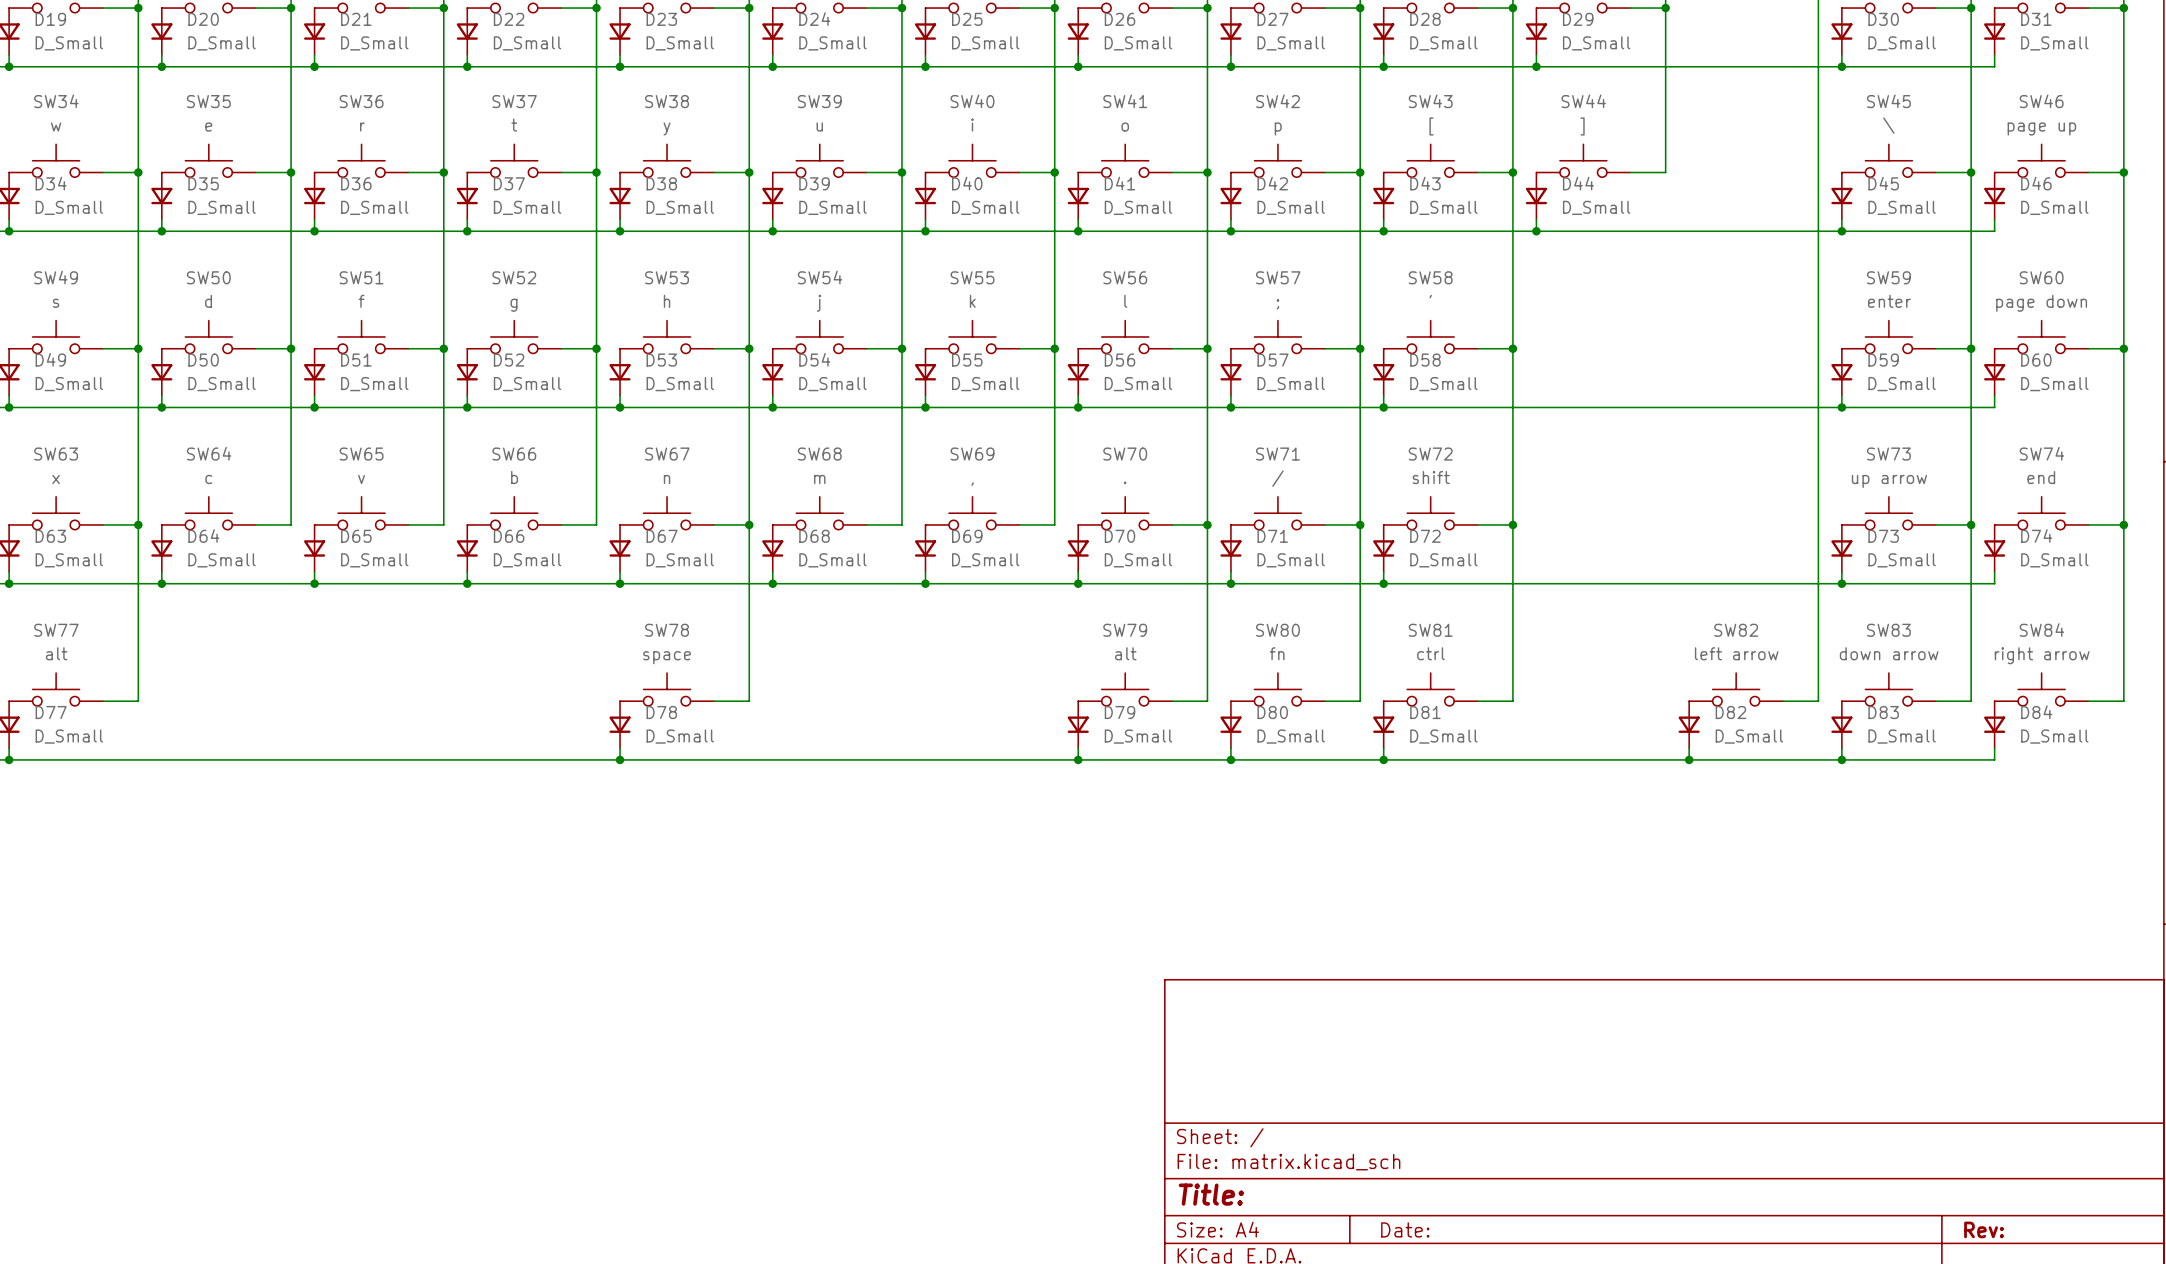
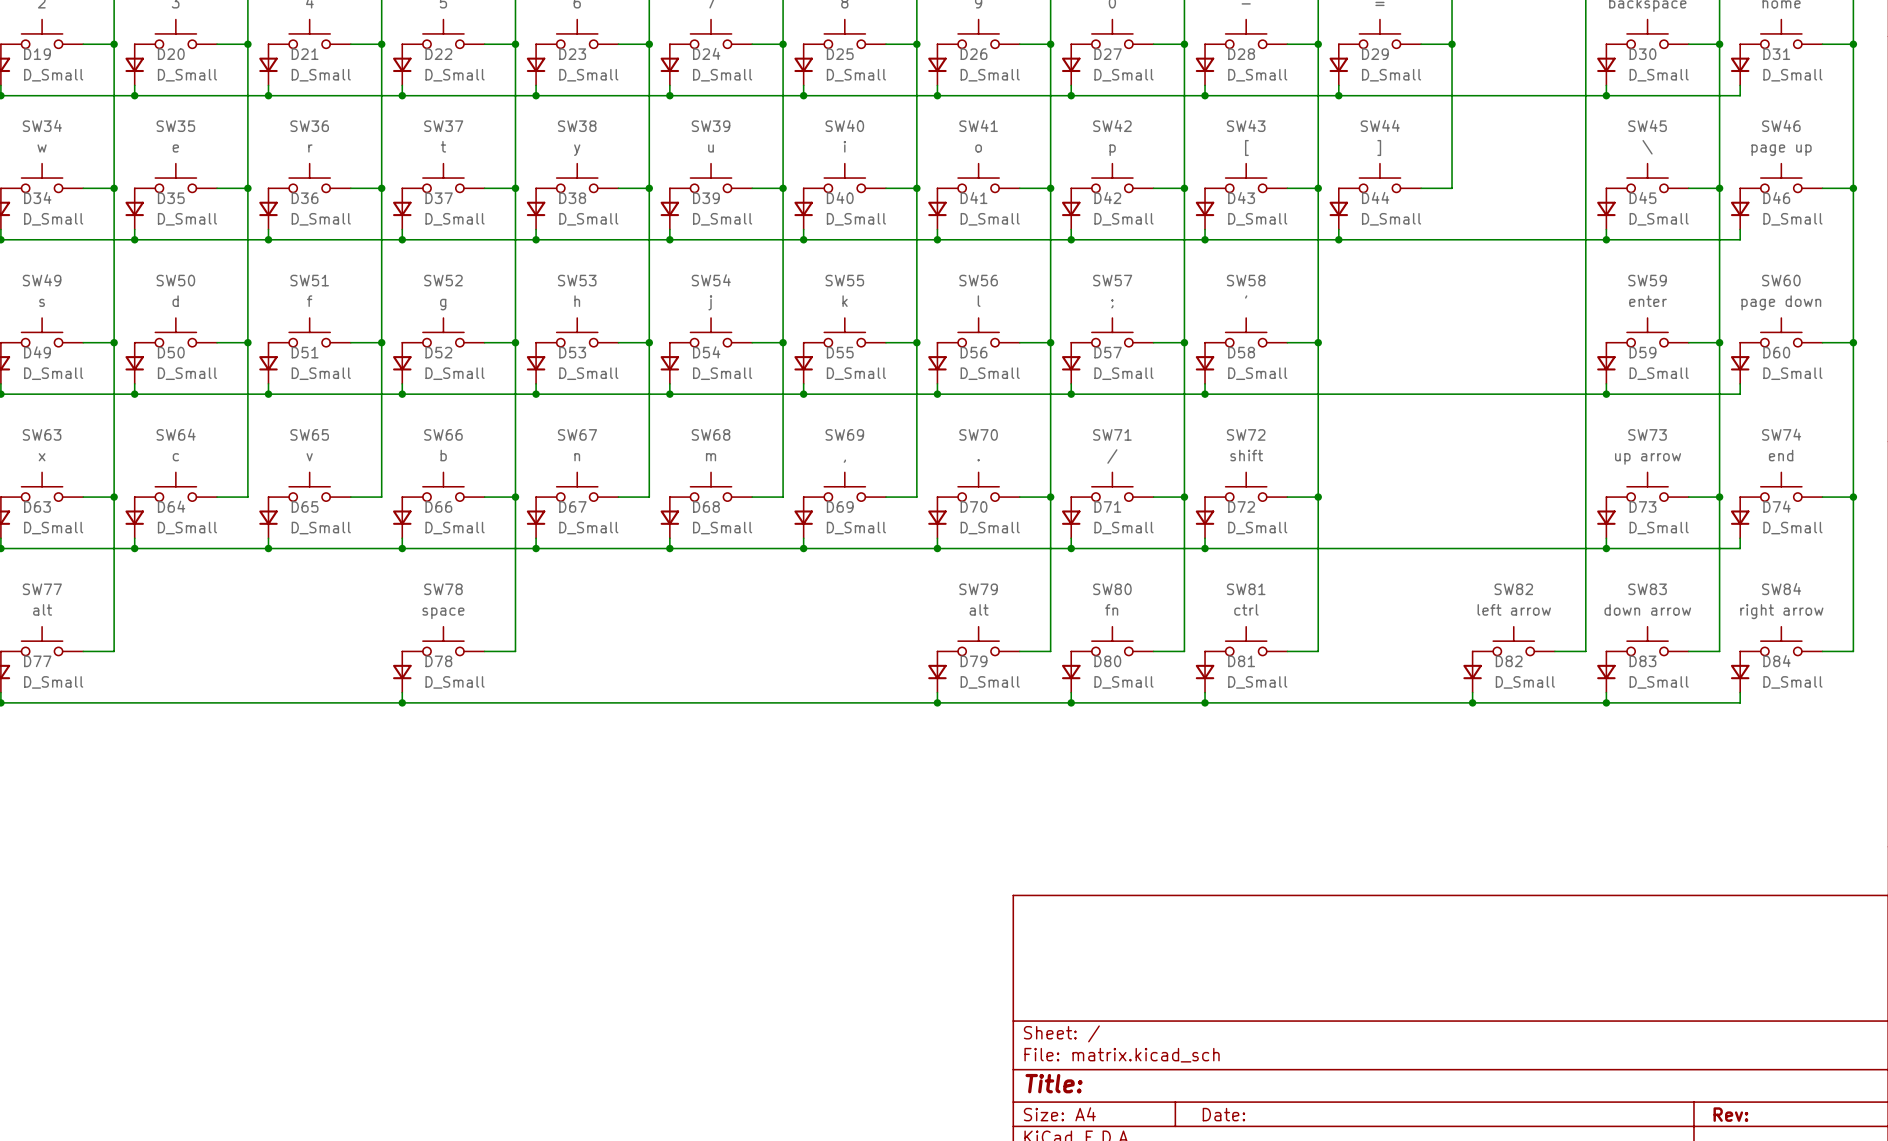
junction: none -> (515, 497)
wire: (749, 524) (749, 701) (714, 701) -> (515, 497) (515, 651) (484, 651)
junction: (749, 524) -> none
SW78 position: (667, 689) -> (443, 641)
D78 position: (620, 724) -> (402, 672)
wire: (620, 748) (620, 759) -> (402, 692) (402, 702)
junction: none -> (402, 702)
junction: (620, 759) -> none

